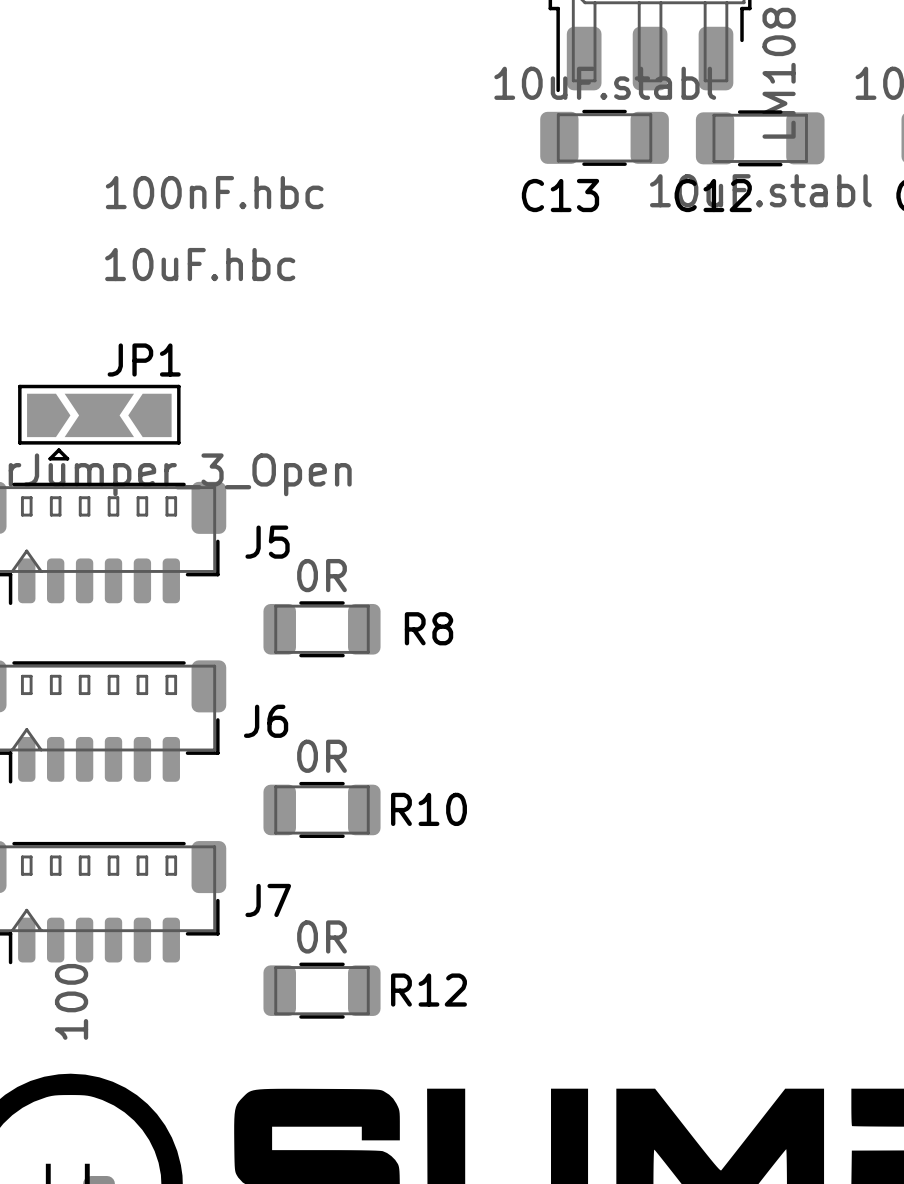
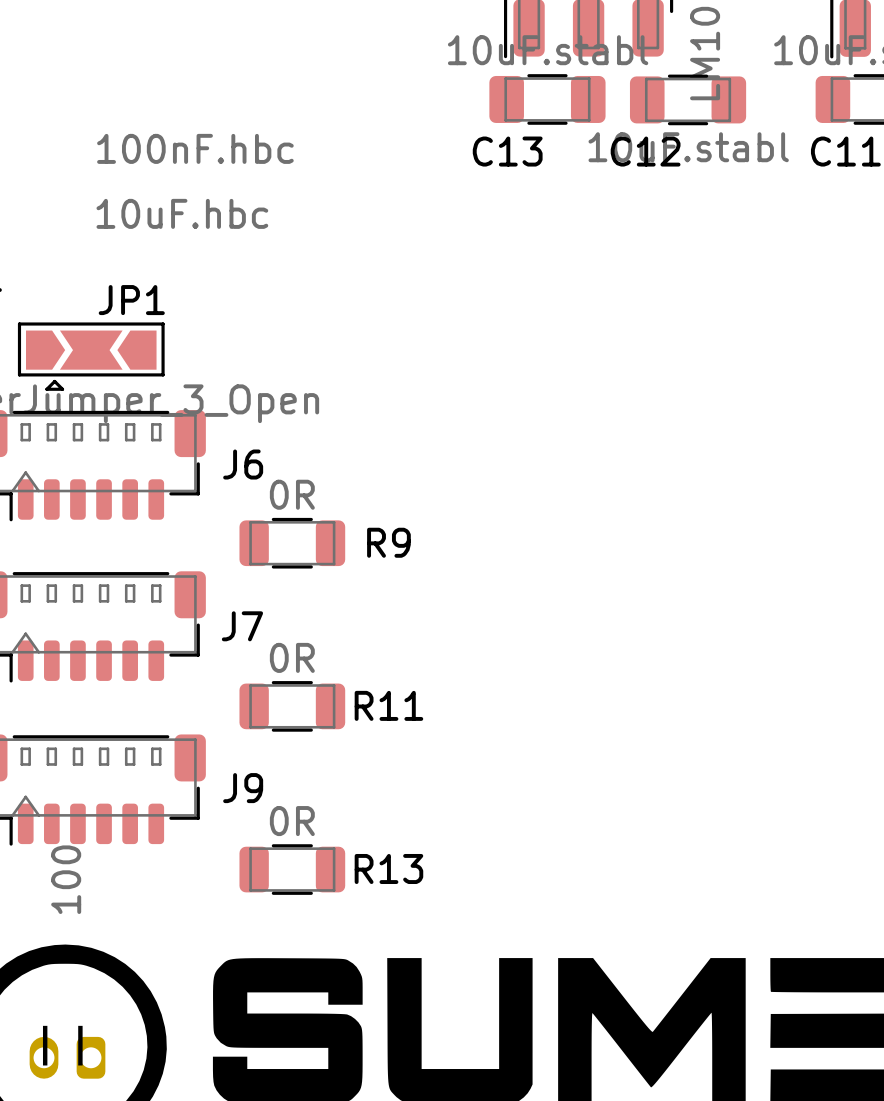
J5 name: J5 (267, 542) -> J6 (243, 464)
R8 name: R8 (428, 628) -> R9 (388, 542)
J6 name: J6 (266, 721) -> J7 (242, 626)
R10 name: R10 (428, 809) -> R11 (388, 705)
J7 name: J7 (268, 900) -> J9 (243, 788)
R12 name: R12 (428, 990) -> R13 (388, 868)

